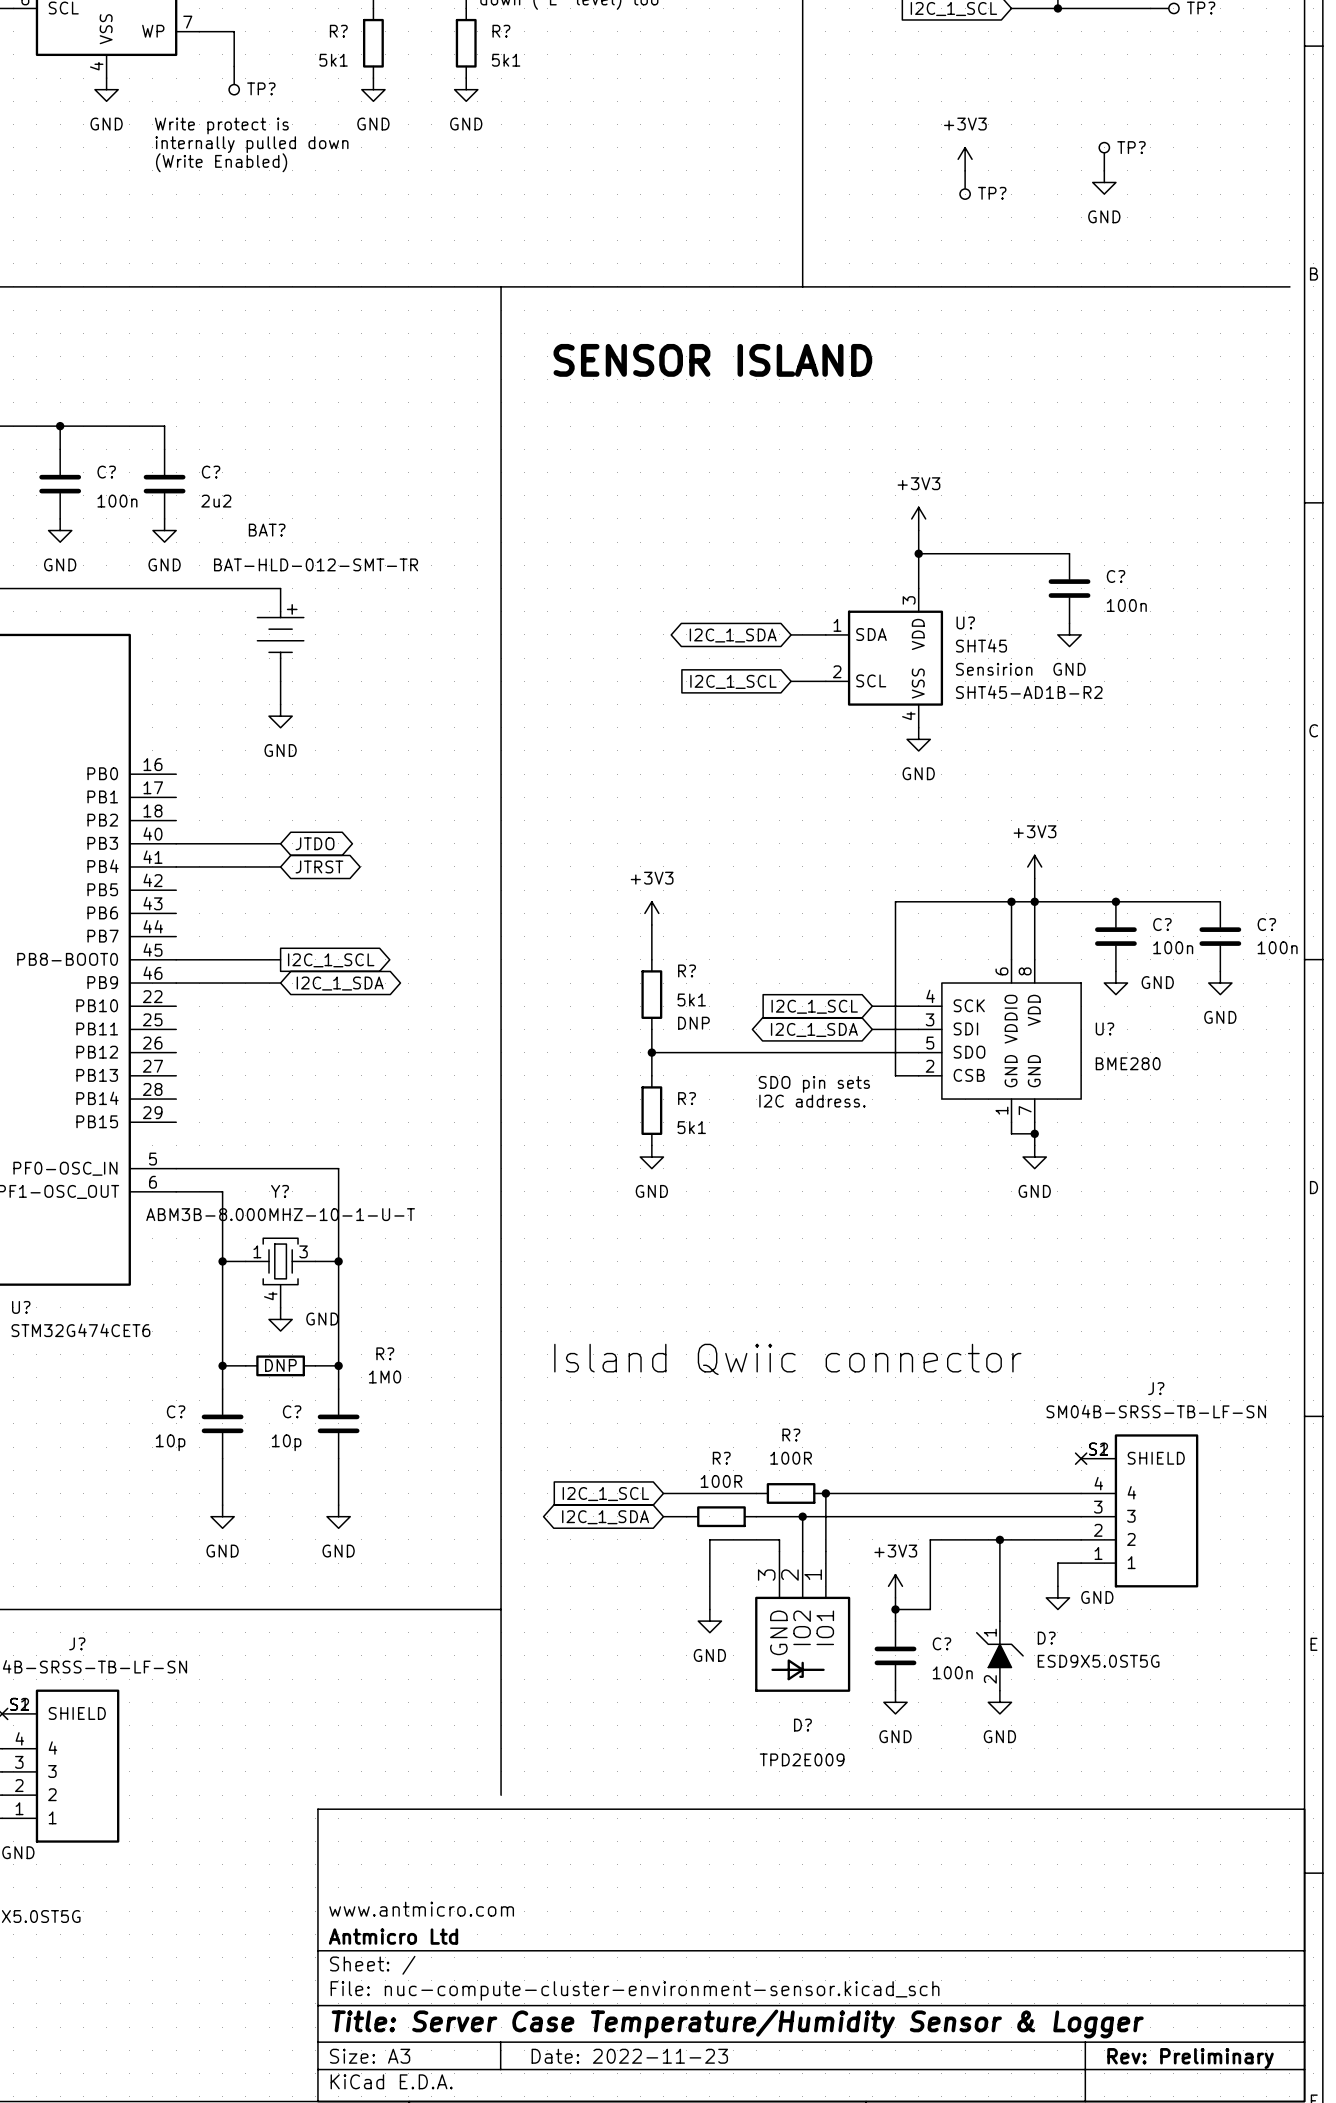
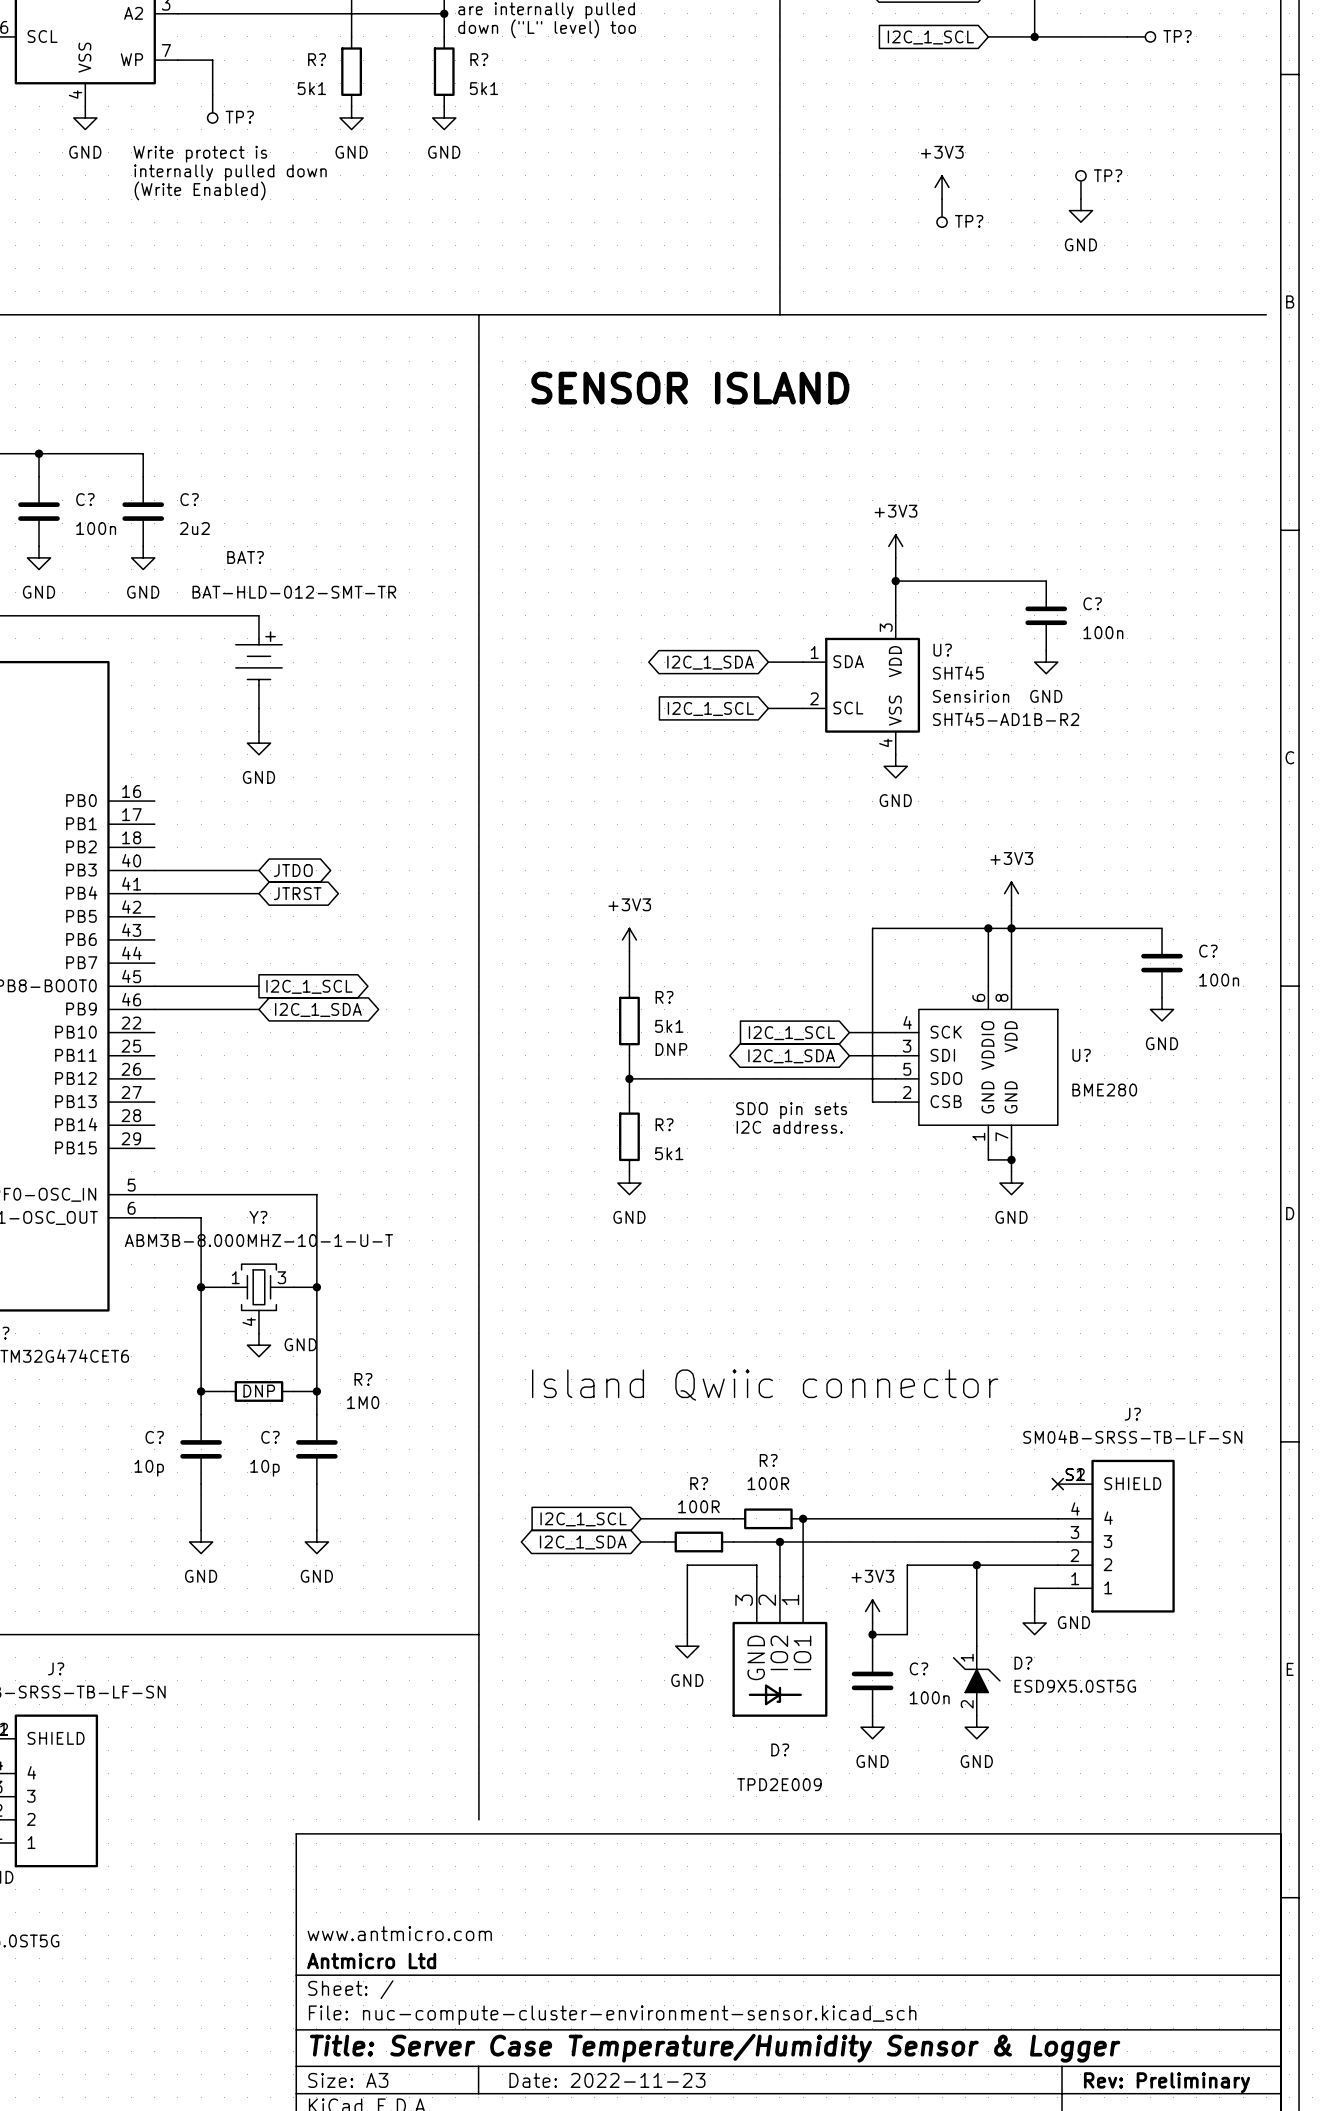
junction: (1115, 901) -> none
wire: (1185, 901) (1220, 901) -> none
C?: (1115, 936) -> none
C?: none -> (1162, 963)
C?: (1220, 936) -> none
power symbol: GND (1115, 983) -> none
power symbol: none -> GND (1162, 1009)
power symbol: GND (1220, 983) -> none

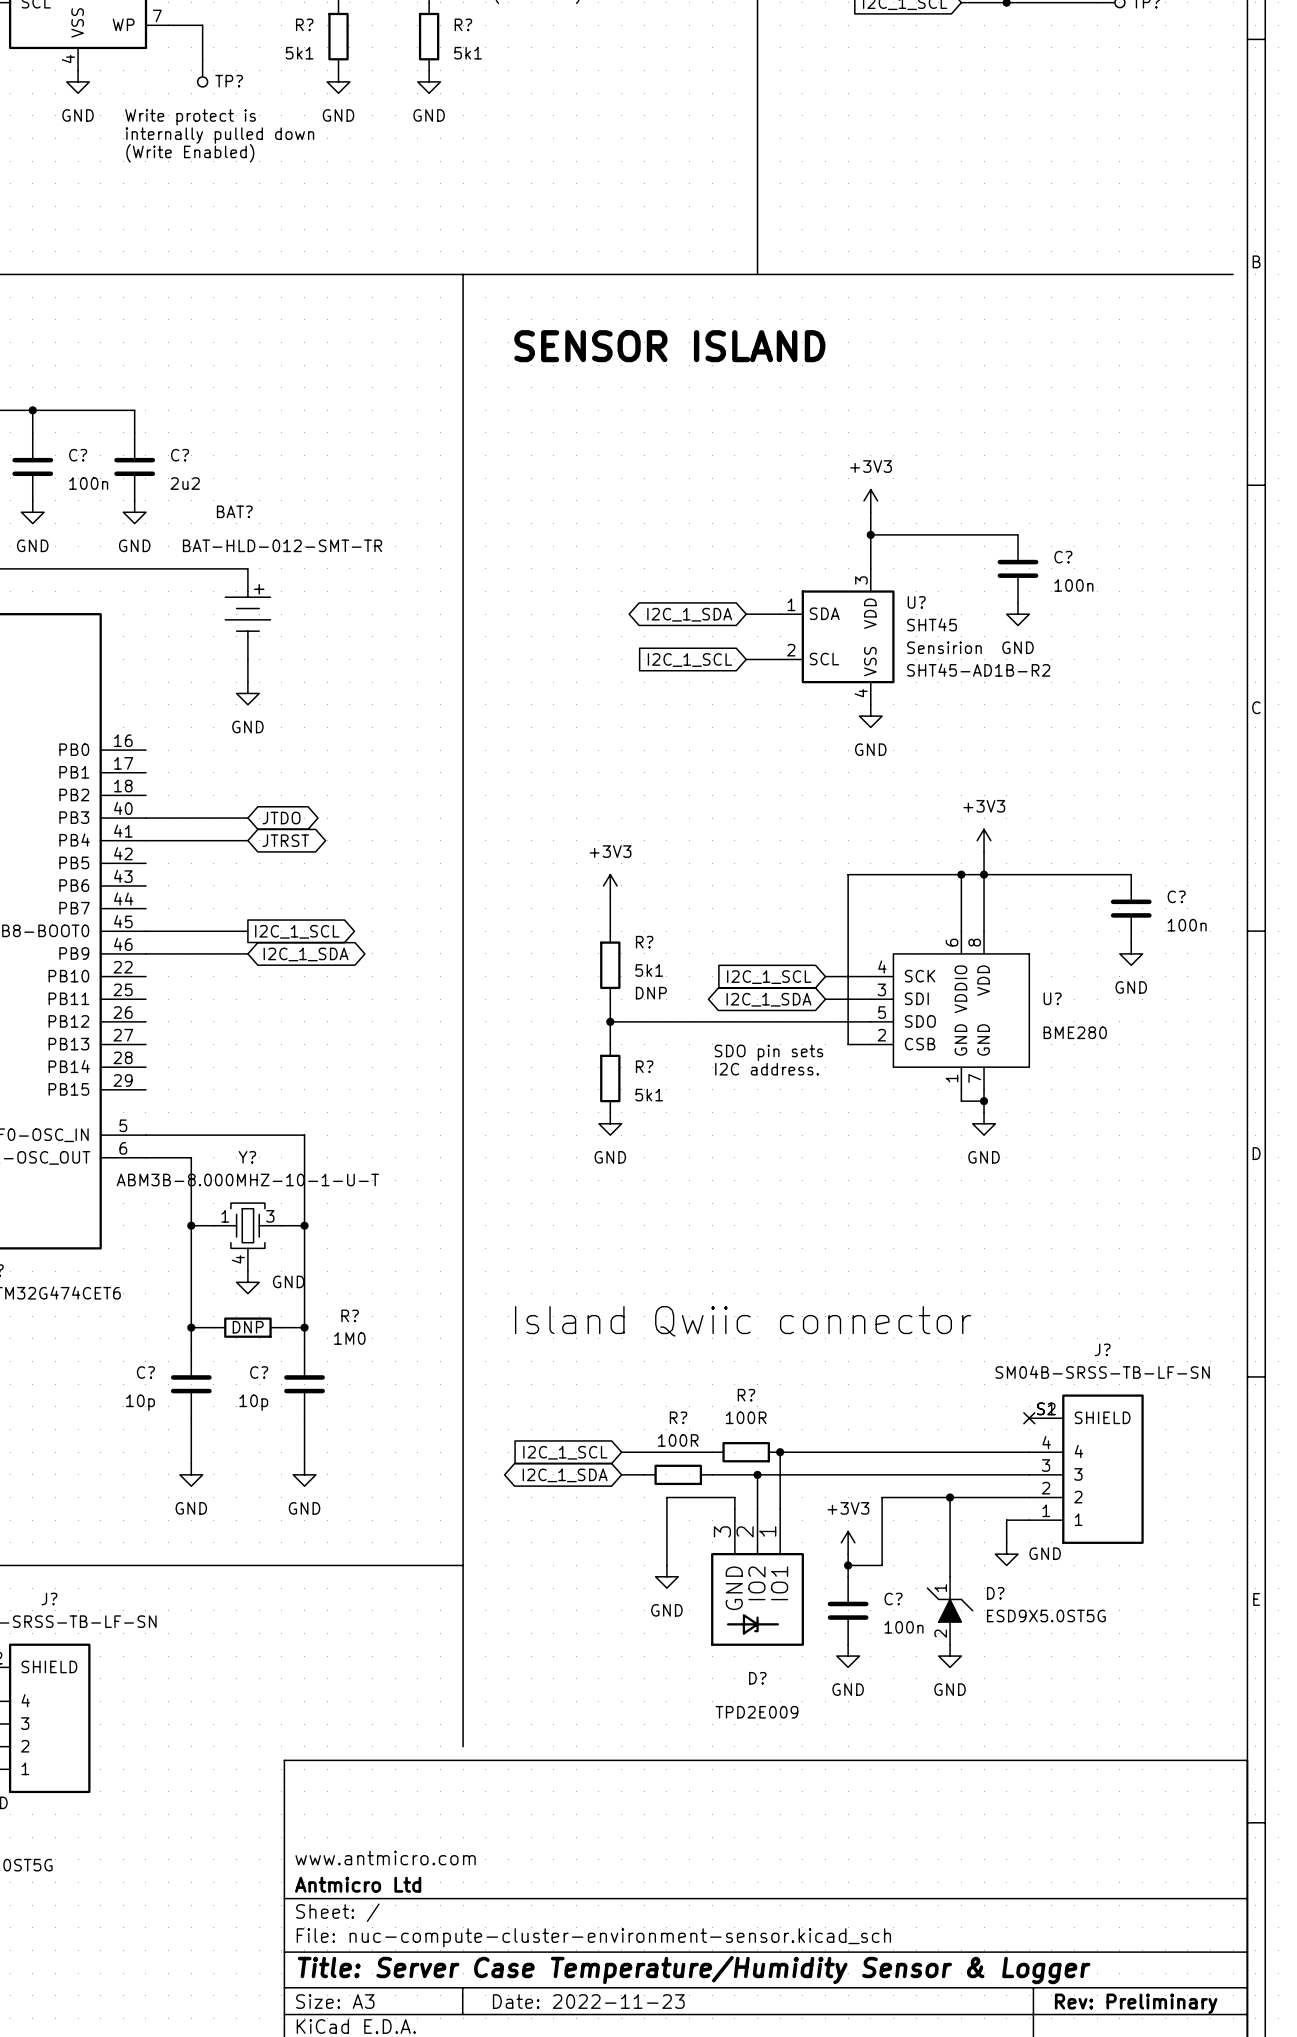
TP?: (1080, 184) -> none
power symbol: +3V3 (942, 187) -> none
power symbol: GND (1080, 210) -> none
TP?: (942, 213) -> none

